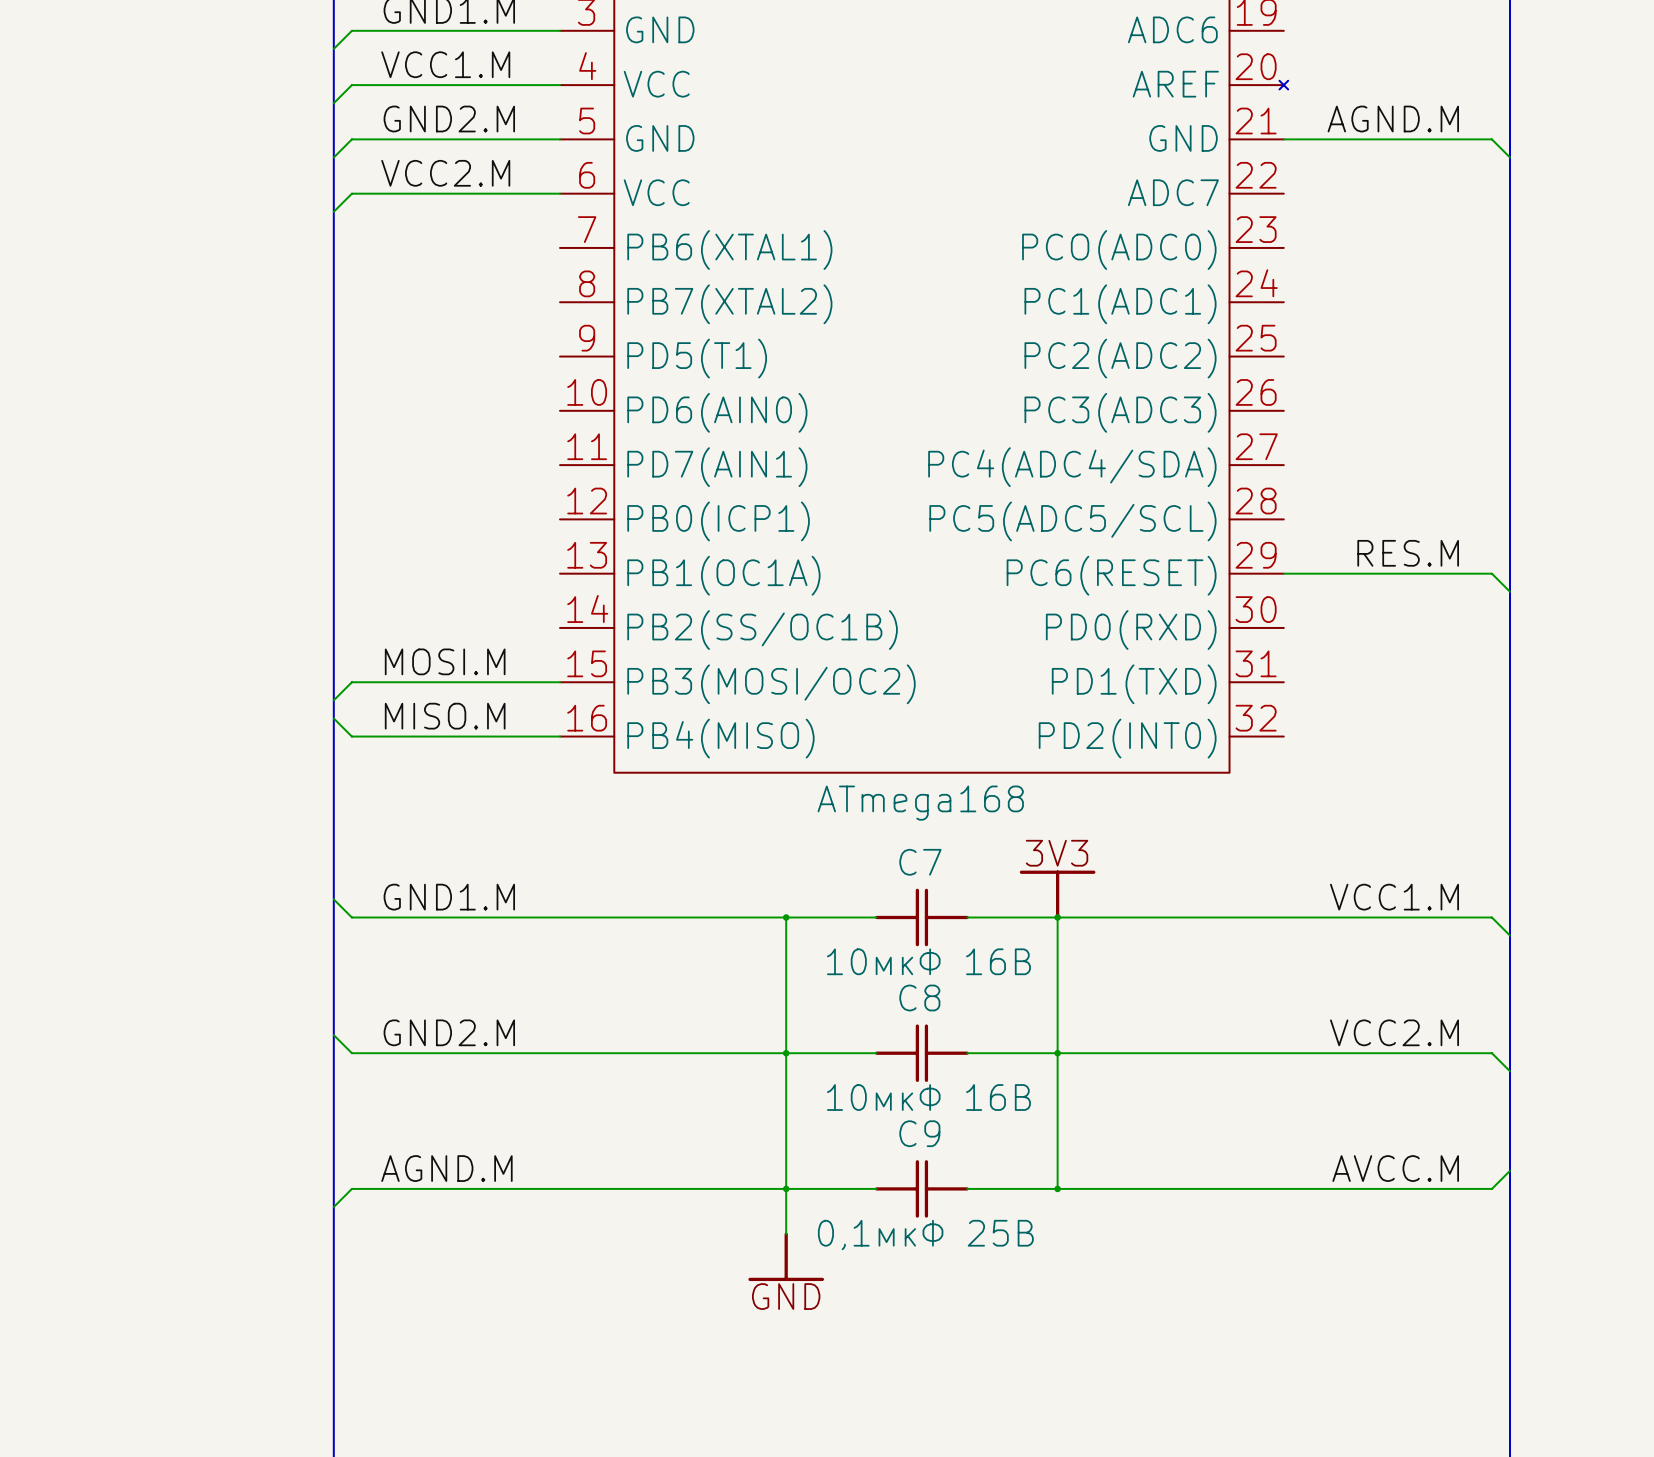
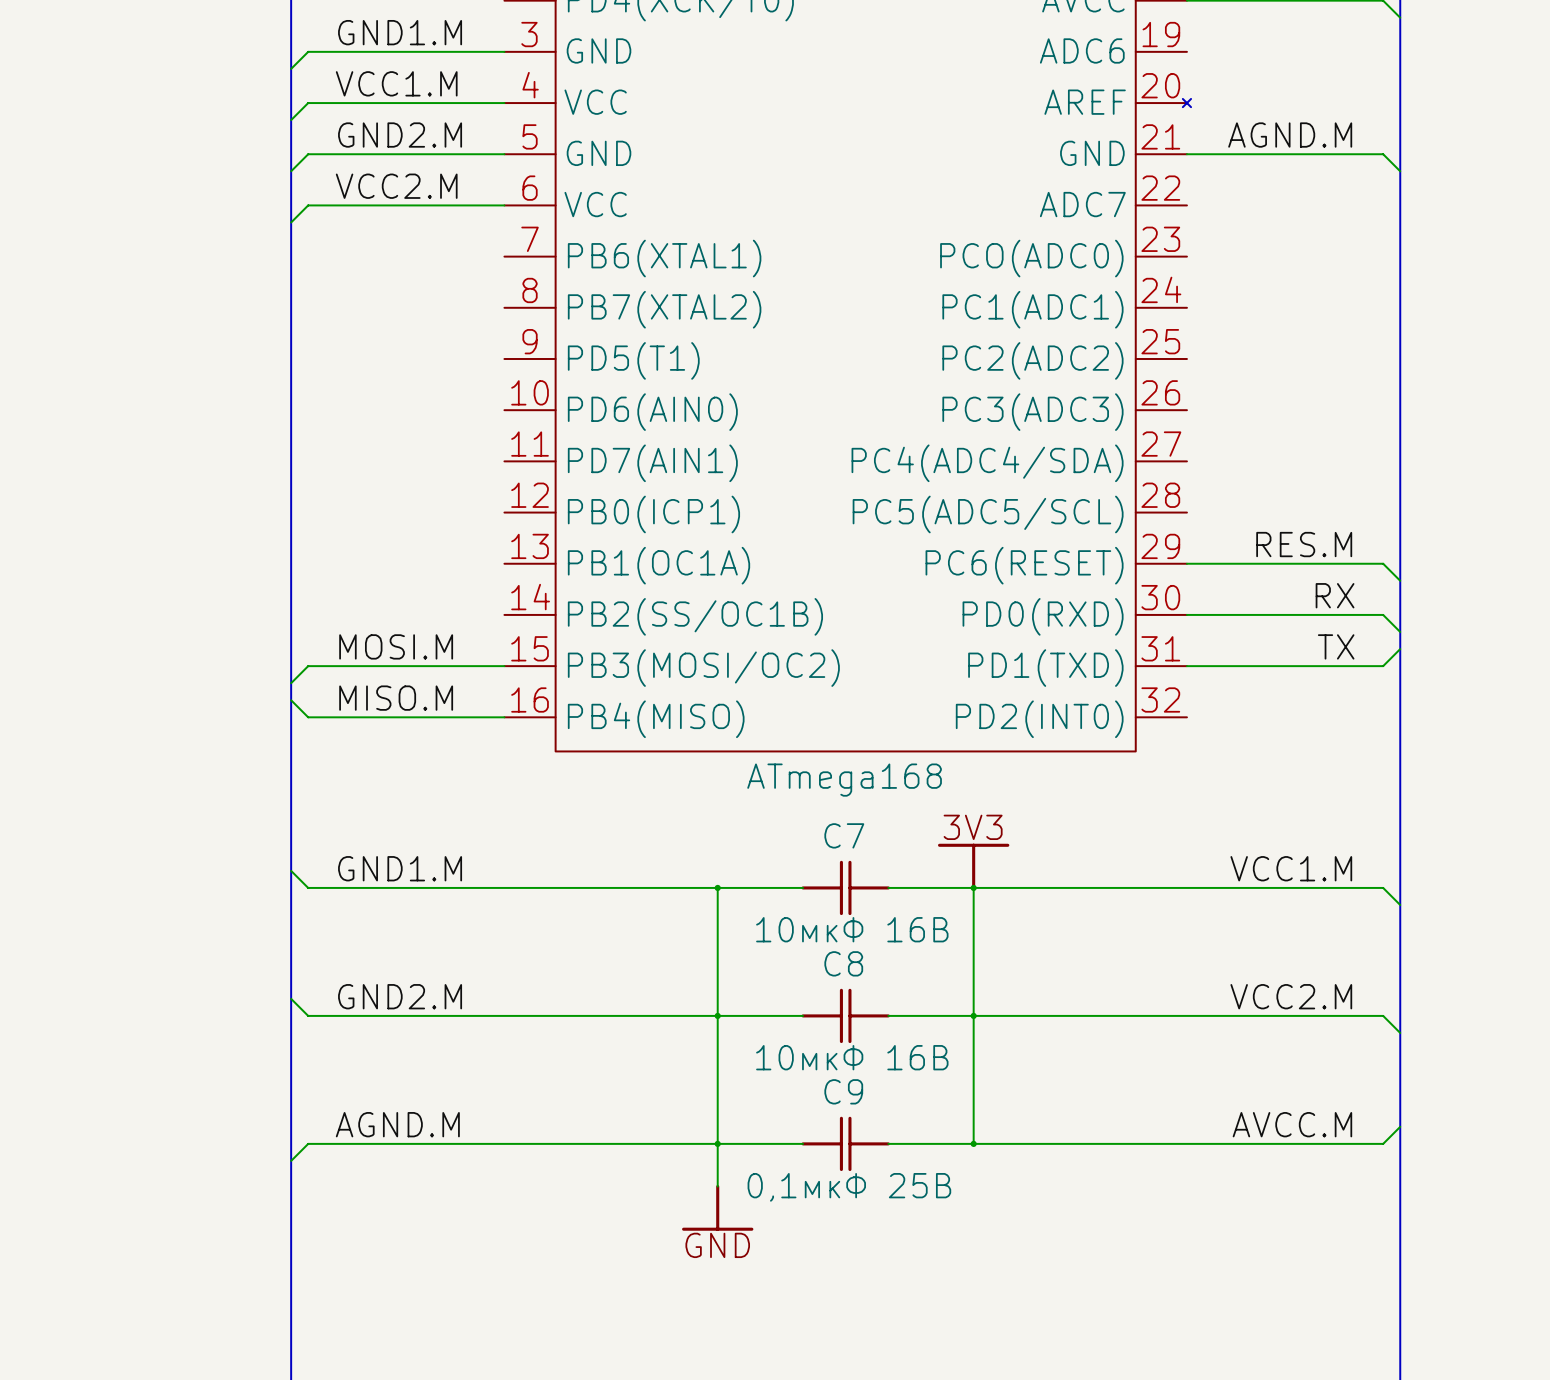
label: none -> RX (1335, 595)
wire: none -> (1186, 614) (1383, 614) (1400, 632)
label: none -> TX (1336, 646)
wire: none -> (1400, 649) (1383, 666) (1186, 666)

